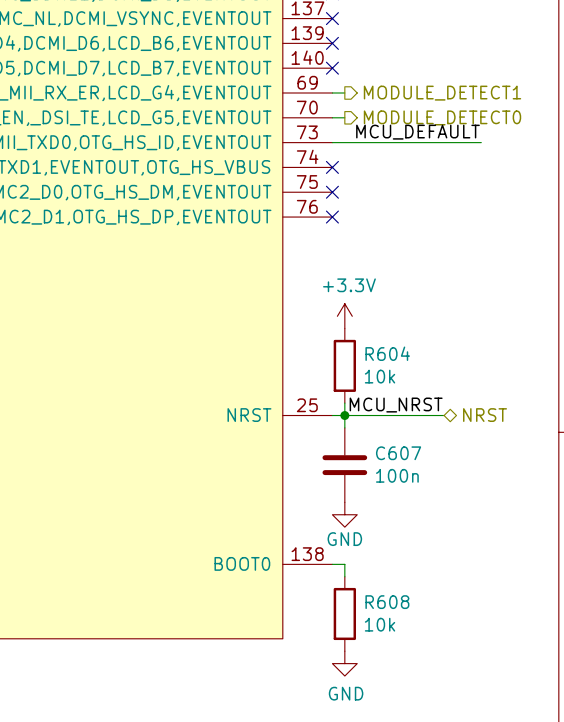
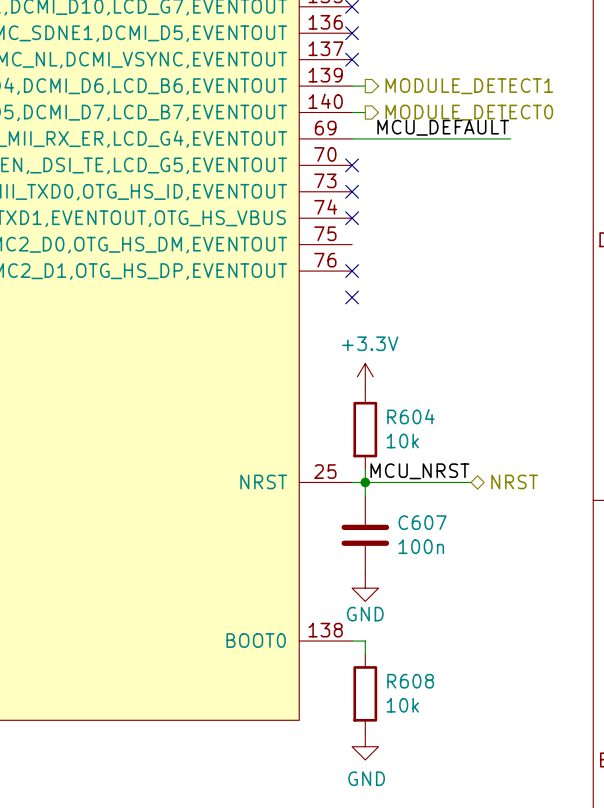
wire: none -> (352, 86) (365, 86)
no-connect mark: (332, 43) -> none
no-connect mark: (332, 68) -> none
wire: none -> (365, 138) (510, 138)
hierarchical label position: MODULE_DETECT1 (442, 93) -> MODULE_DETECT1 (469, 86)
wire: (332, 117) (344, 117) -> (352, 112) (365, 112)
no-connect mark: none -> (352, 165)
hierarchical label position: MODULE_DETECT0 (442, 117) -> MODULE_DETECT0 (469, 112)
label position: MCU_DEFAULT (417, 132) -> MCU_DEFAULT (443, 127)
wire: (332, 142) (481, 142) -> none
no-connect mark: none -> (352, 191)
no-connect mark: (332, 192) -> none
no-connect mark: none -> (352, 297)

